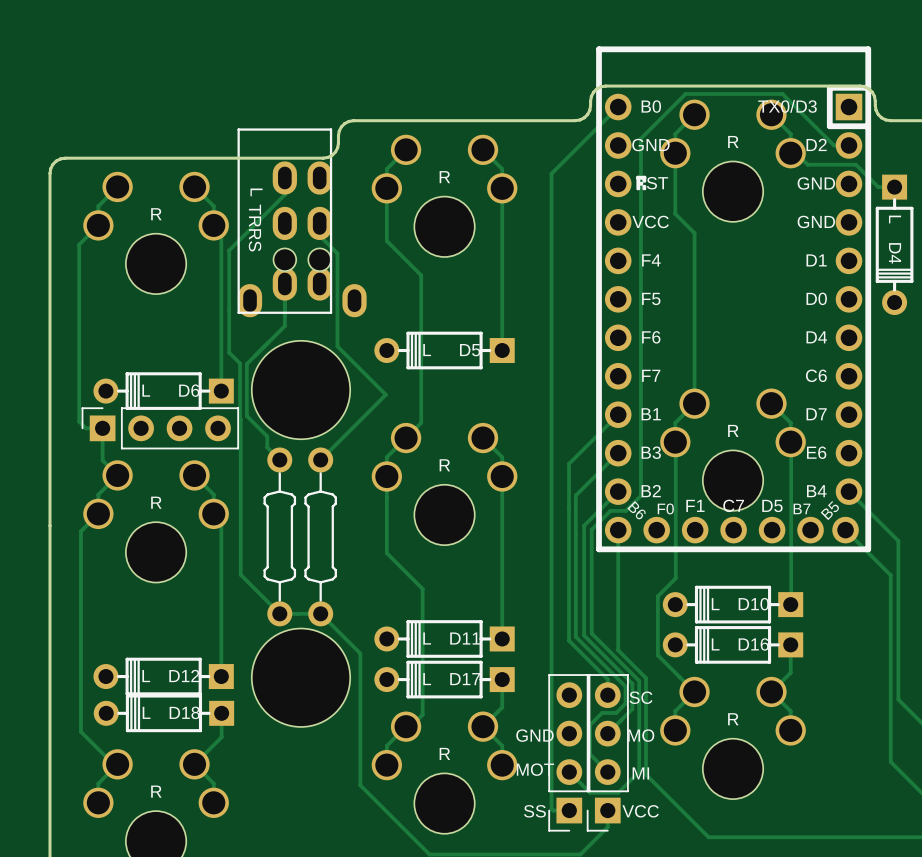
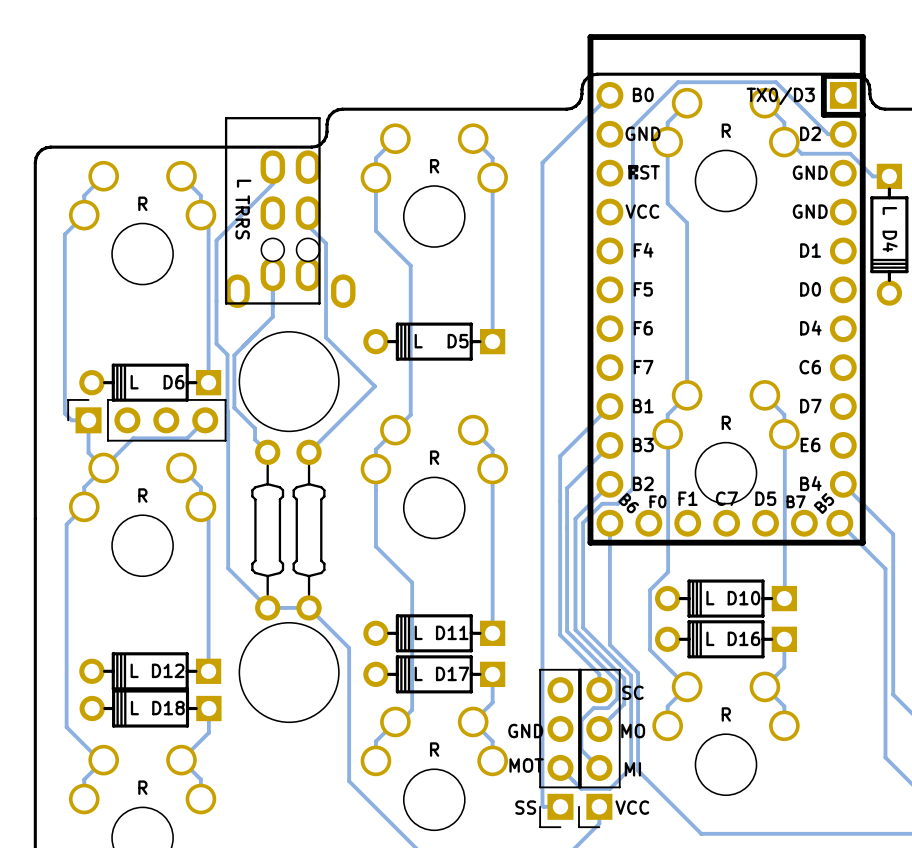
track: none -> (205, 420) (187, 438) (133, 438) (103, 467)

